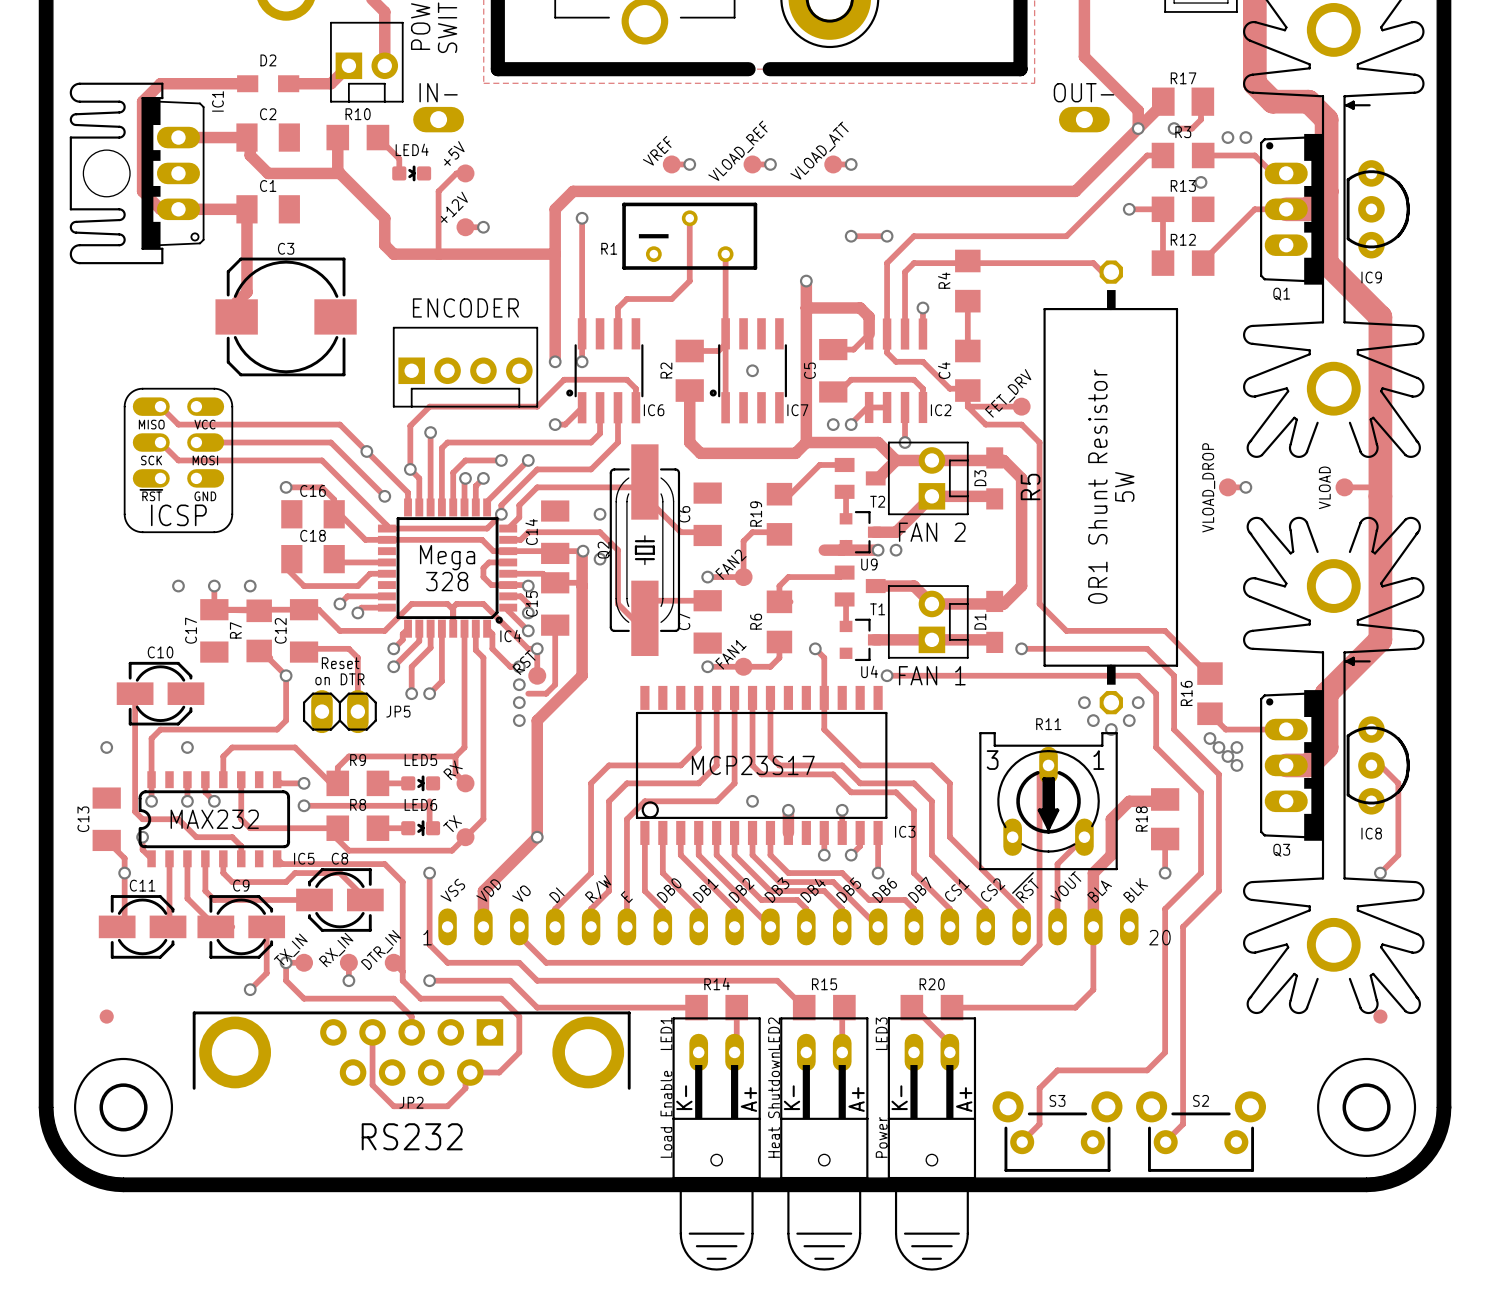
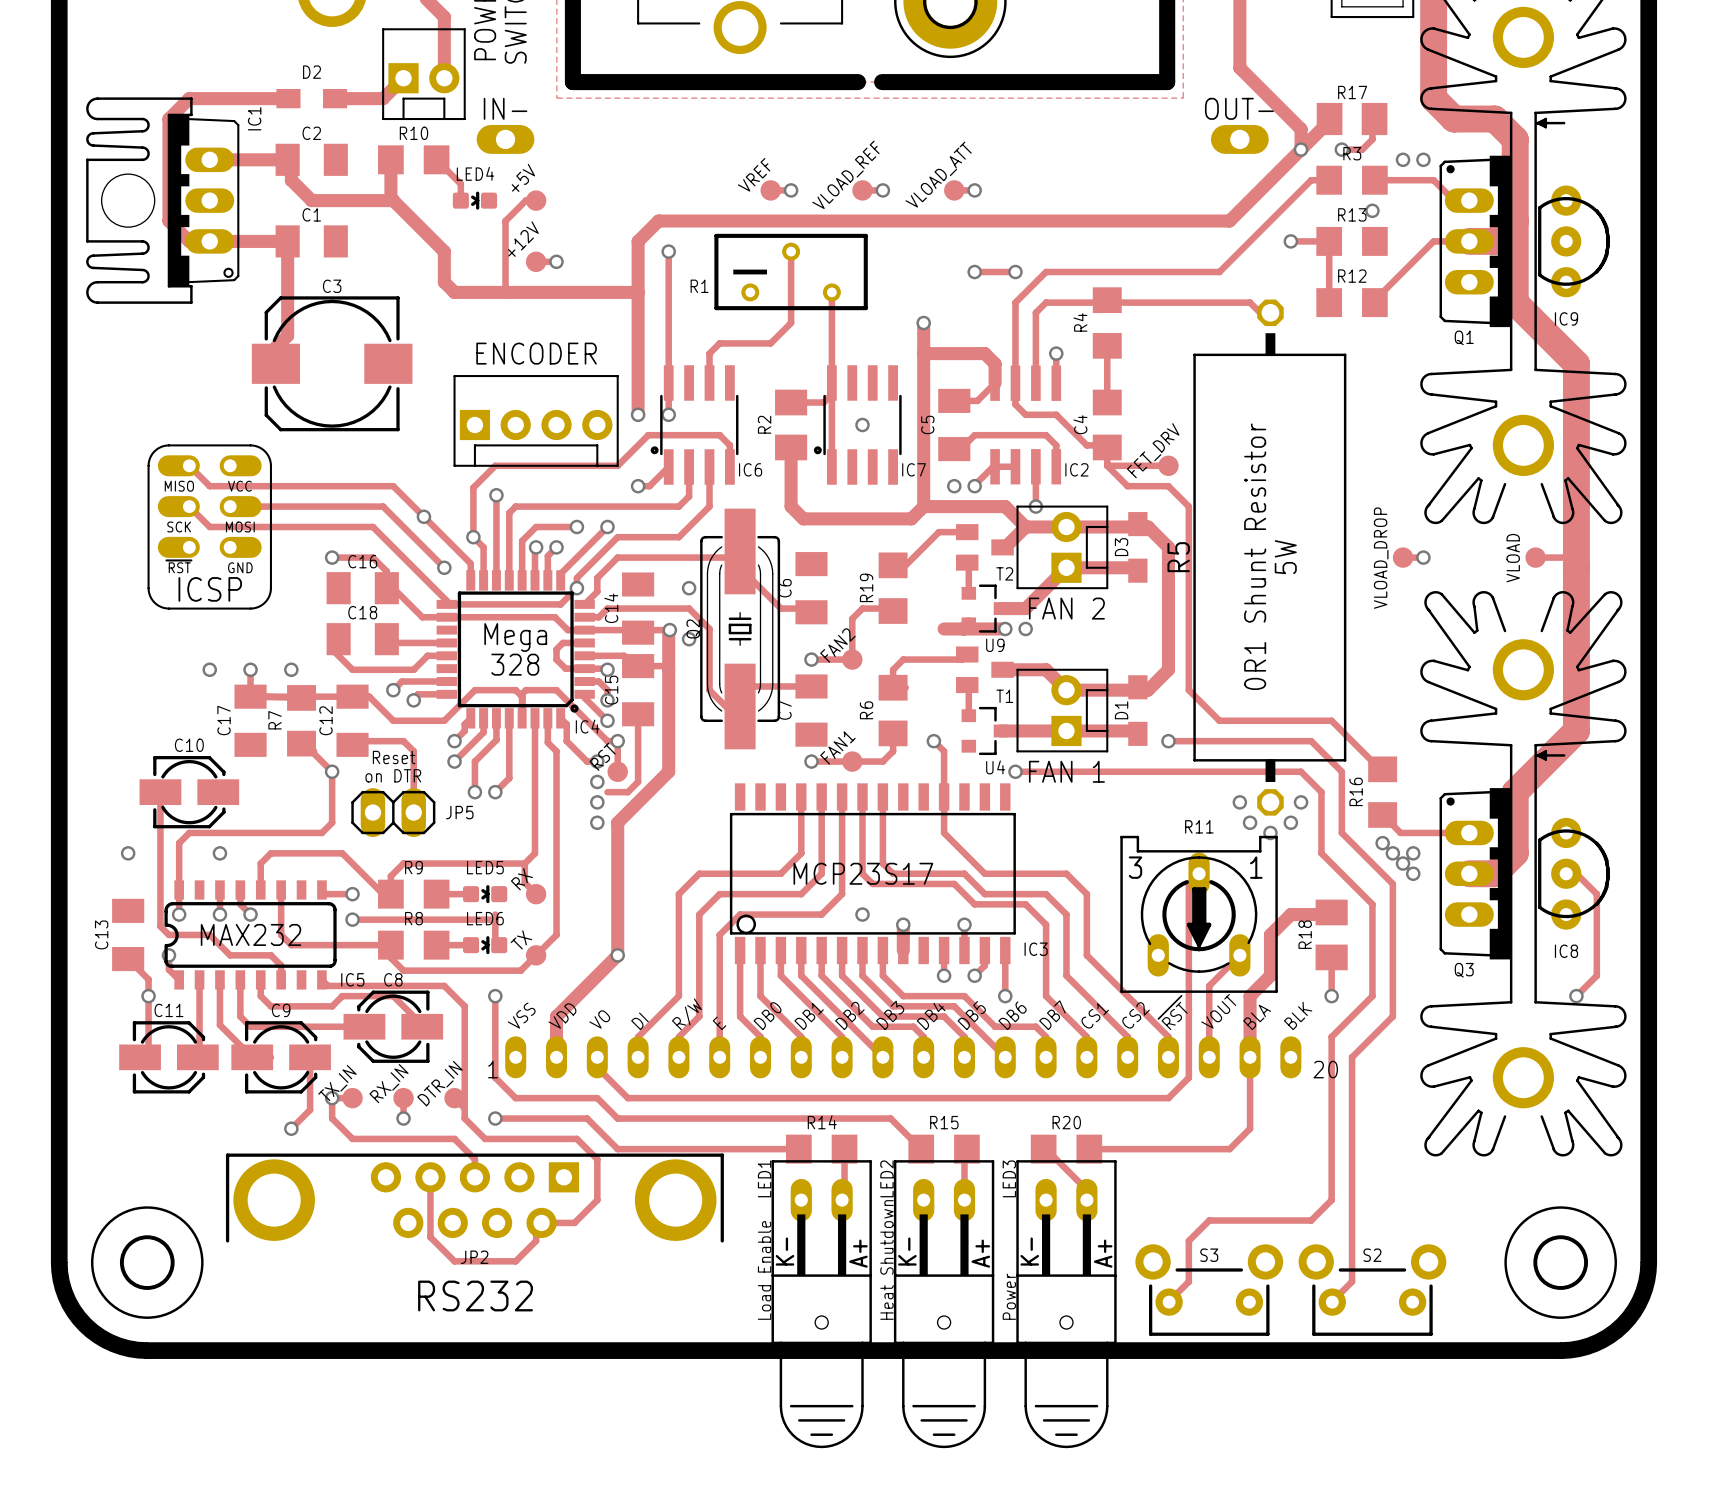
part: (106, 1016) -> none
part: (1380, 1016) -> none

